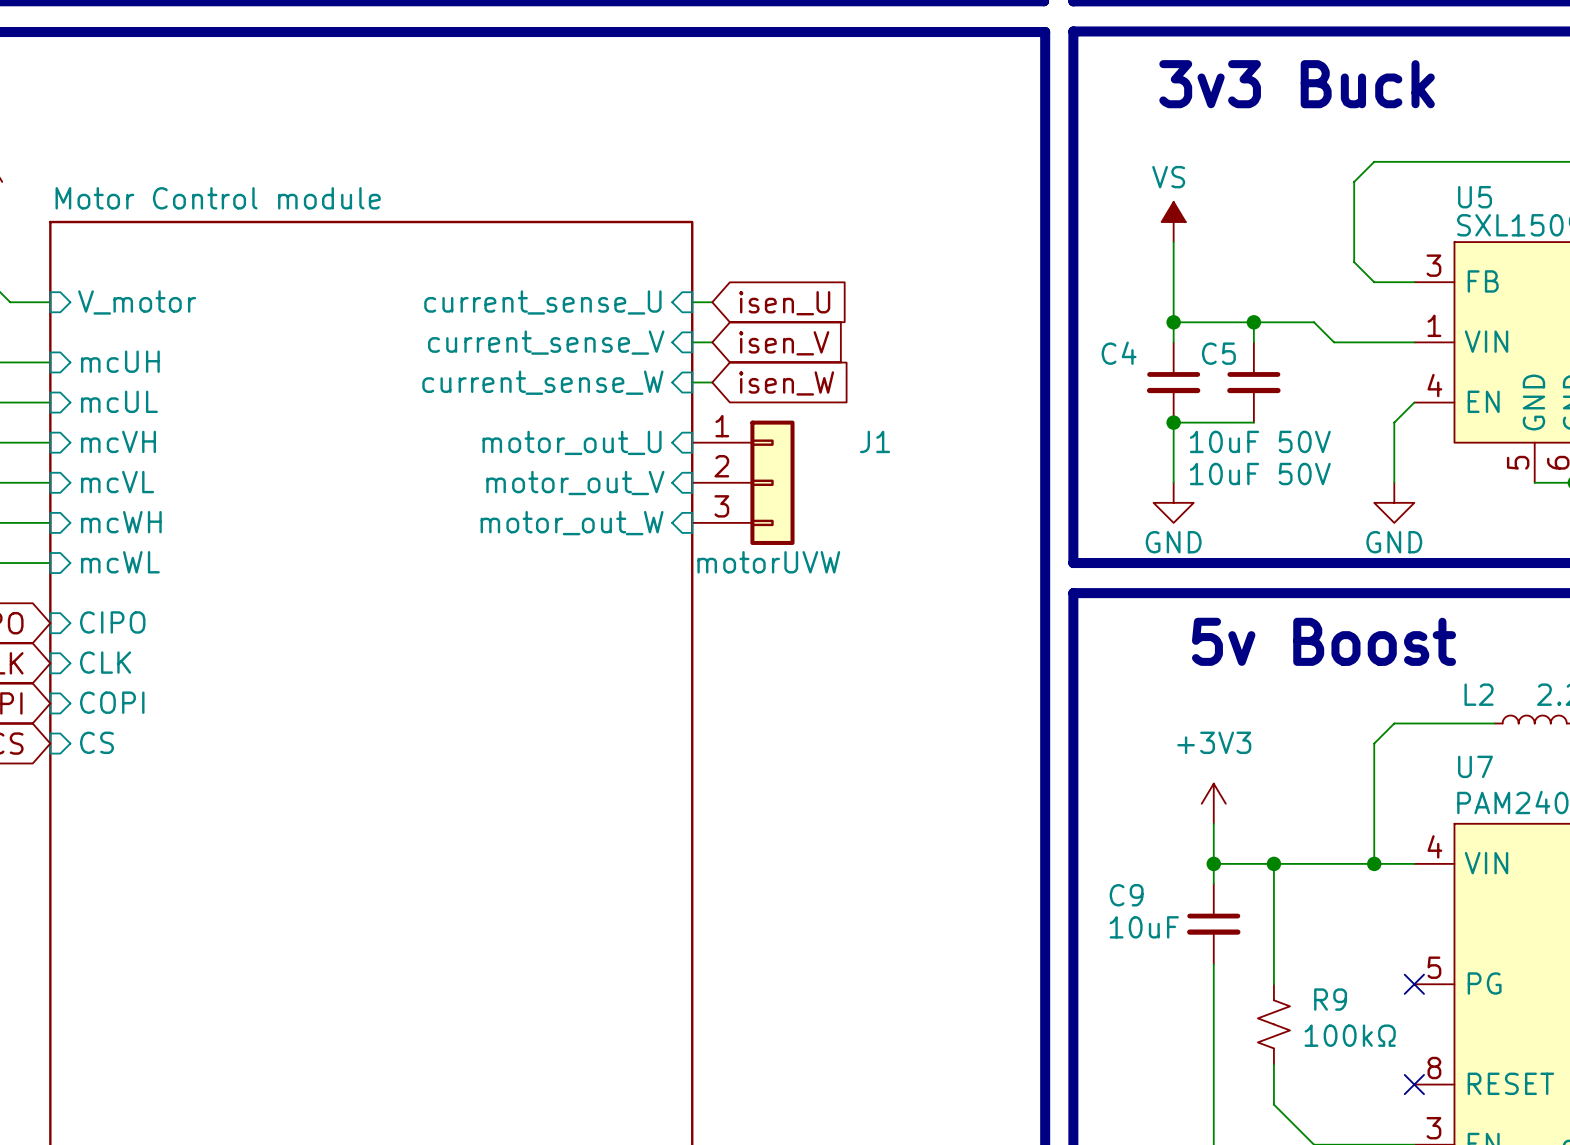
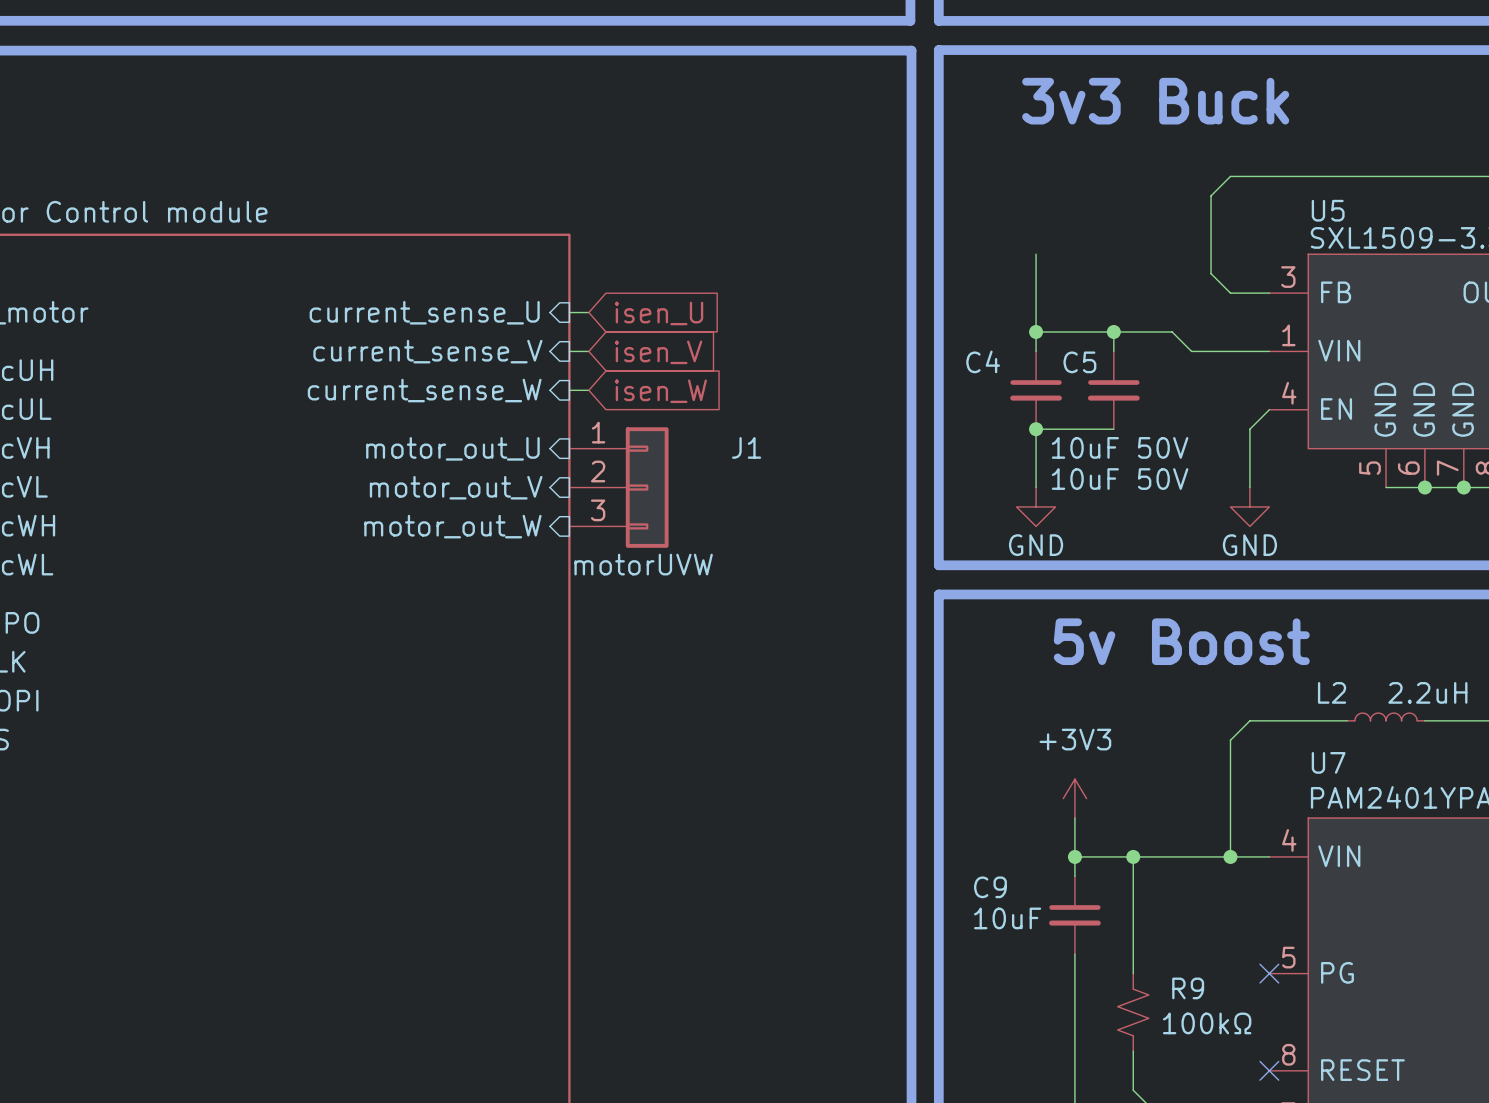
power symbol: VS (1173, 222) -> none

